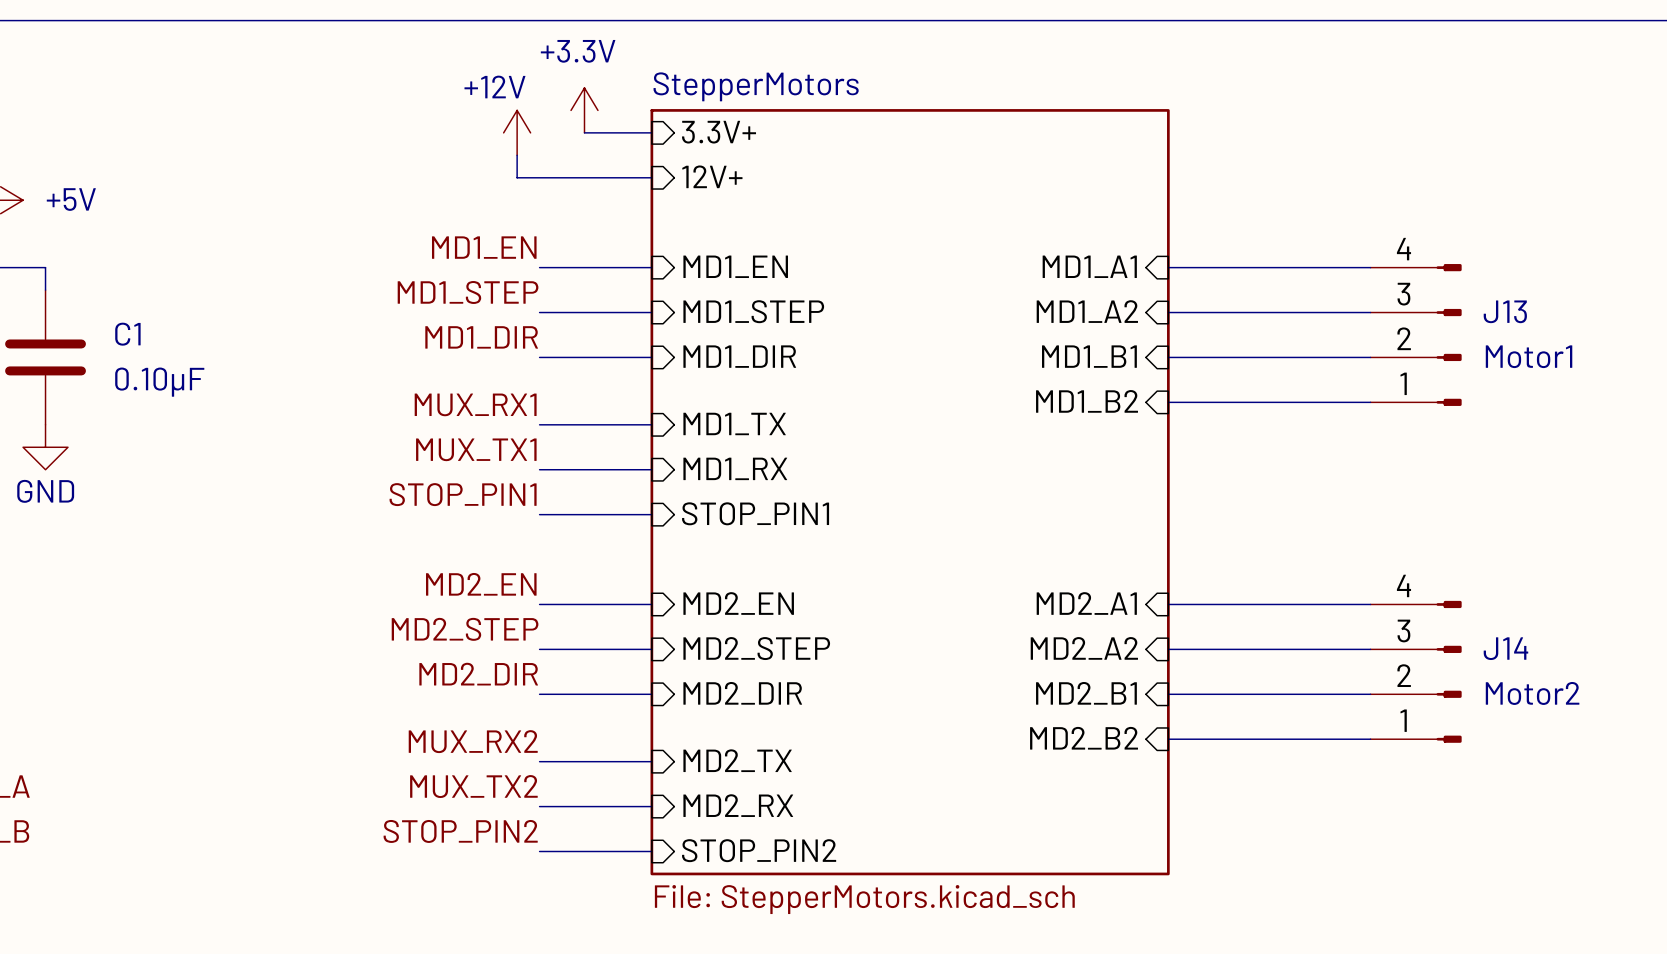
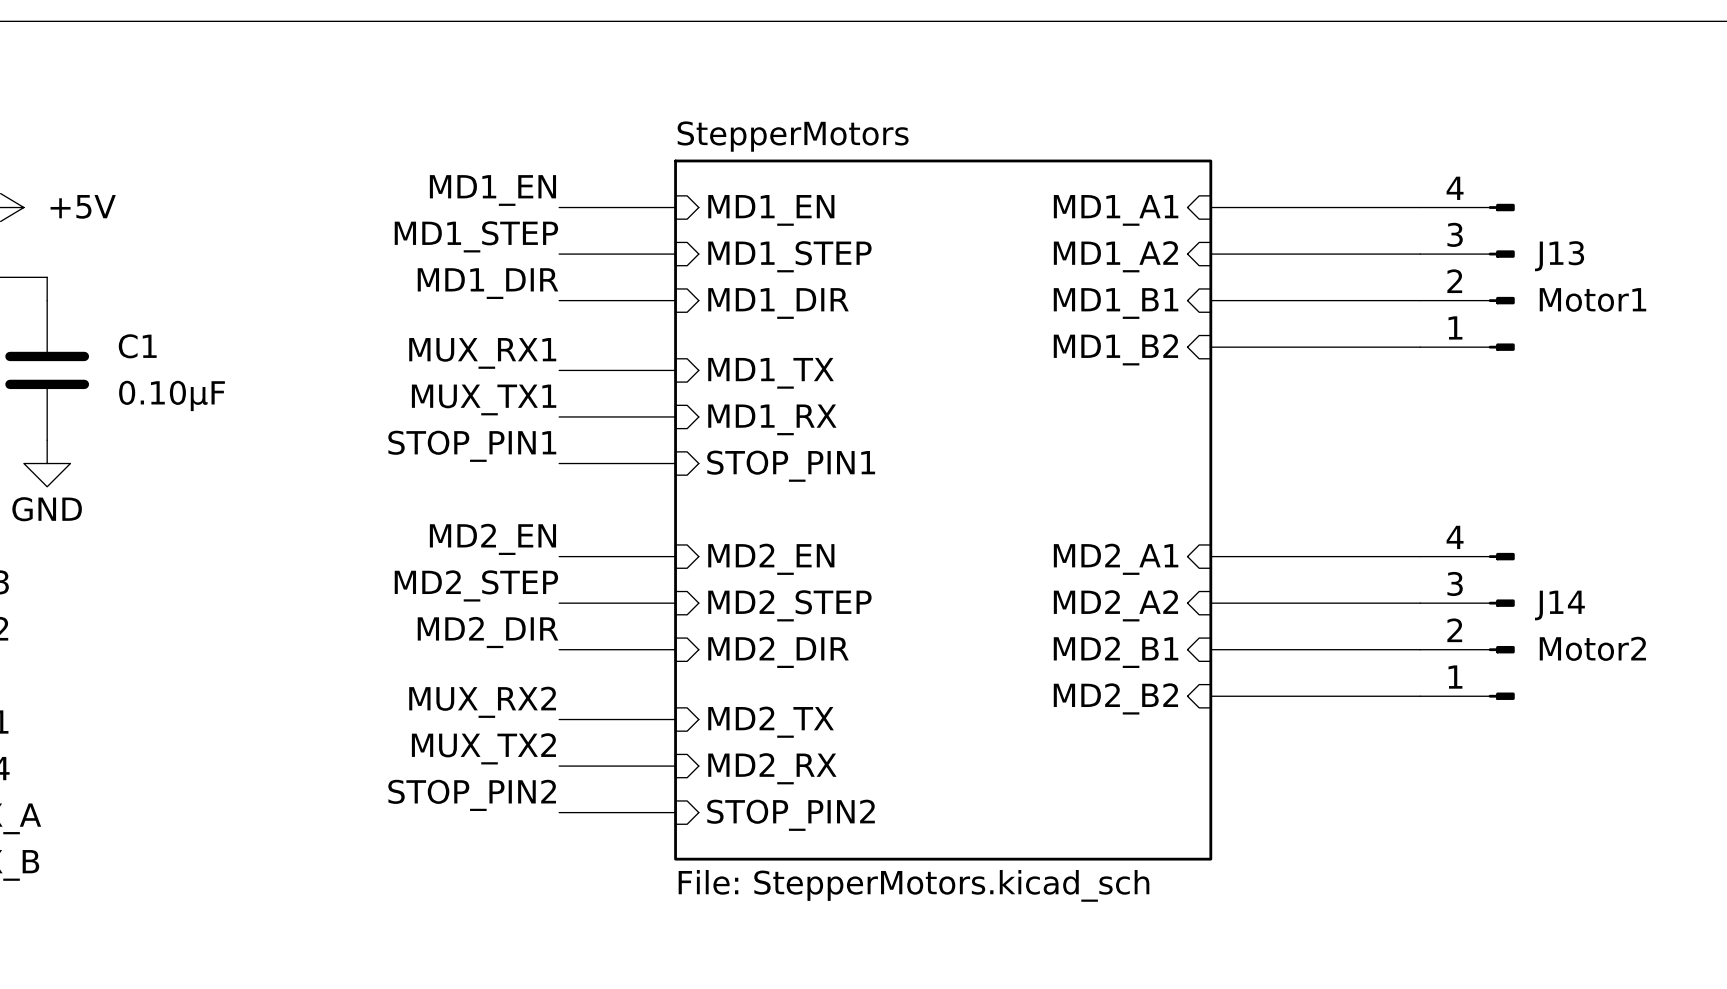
sheet StepperMotors name position: StepperMotors (756, 86) -> StepperMotors (793, 136)
sheet StepperMotors shape: [650, 109, 1170, 876] -> [674, 159, 1213, 861]
power symbol: +3.3V (584, 110) -> none
power symbol: +12V (517, 132) -> none
wire: (584, 132) (651, 132) -> none
sheet pin: 3.3V+ (719, 132) -> none
wire: (517, 155) (517, 177) (651, 177) -> none
sheet pin: 12V+ (712, 176) -> none
label position: MD1_EN (484, 247) -> MD1_EN (492, 190)
sheet pin position: MD1_EN (735, 266) -> MD1_EN (771, 210)
sheet pin position: MD1_A1 (1089, 266) -> MD1_A1 (1116, 210)
wire: (539, 267) (651, 267) -> (559, 207) (675, 207)
wire: (1168, 267) (1370, 267) -> (1210, 207) (1420, 207)
label: none -> MD1_DIR (488, 283)
sheet pin: none -> MD1_DIR (778, 303)
label position: MD1_STEP (468, 292) -> MD1_STEP (476, 236)
sheet pin position: MD1_STEP (753, 311) -> MD1_STEP (789, 256)
sheet pin position: MD1_A2 (1087, 311) -> MD1_A2 (1115, 256)
wire: (539, 312) (651, 312) -> (559, 254) (675, 254)
wire: (1168, 312) (1370, 312) -> (1210, 254) (1420, 254)
J13 position: (1416, 334) -> (1467, 277)
label: MD1_DIR (481, 337) -> MUX_RX1 (482, 353)
sheet pin: MD1_DIR (739, 356) -> MD1_TX (771, 373)
sheet pin position: MD1_B1 (1089, 356) -> MD1_B1 (1116, 303)
wire: (1168, 357) (1370, 357) -> (1210, 300) (1420, 300)
sheet pin position: MD1_B2 (1087, 401) -> MD1_B2 (1115, 349)
wire: (1168, 402) (1370, 402) -> (1210, 347) (1420, 347)
label: MUX_RX1 (475, 404) -> none
sheet pin: MD1_TX (734, 423) -> none
wire: (539, 424) (651, 424) -> (559, 300) (675, 300)
label position: MUX_TX1 (476, 449) -> MUX_TX1 (484, 399)
sheet pin position: MD1_RX (735, 468) -> MD1_RX (772, 419)
wire: (539, 469) (651, 469) -> (559, 416) (675, 416)
label position: STOP_PIN1 (463, 494) -> STOP_PIN1 (472, 446)
sheet pin position: STOP_PIN1 (755, 513) -> STOP_PIN1 (791, 466)
wire: (539, 514) (651, 514) -> (559, 463) (675, 463)
label position: MD2_EN (481, 584) -> MD2_EN (492, 539)
sheet pin position: MD2_EN (738, 603) -> MD2_EN (771, 559)
sheet pin position: MD2_A1 (1086, 603) -> MD2_A1 (1116, 559)
wire: (539, 604) (651, 604) -> (559, 556) (675, 556)
wire: (1168, 604) (1370, 604) -> (1210, 556) (1420, 556)
label: none -> MD2_DIR (488, 632)
sheet pin: none -> MD2_DIR (778, 652)
label position: MD2_STEP (465, 629) -> MD2_STEP (476, 585)
sheet pin position: MD2_STEP (756, 648) -> MD2_STEP (789, 605)
sheet pin position: MD2_A2 (1084, 648) -> MD2_A2 (1115, 605)
wire: (539, 649) (651, 649) -> (559, 603) (675, 603)
wire: (1168, 649) (1370, 649) -> (1210, 603) (1420, 603)
J14 position: (1416, 671) -> (1467, 626)
label: MD2_DIR (478, 674) -> MUX_RX2 (482, 702)
sheet pin: MD2_DIR (742, 693) -> MD2_TX (771, 722)
sheet pin position: MD2_B1 (1086, 693) -> MD2_B1 (1116, 652)
wire: (1168, 694) (1370, 694) -> (1210, 649) (1420, 649)
sheet pin position: MD2_B2 (1084, 738) -> MD2_B2 (1115, 698)
wire: (1168, 739) (1370, 739) -> (1210, 696) (1420, 696)
label: MUX_RX2 (473, 741) -> none
sheet pin: MD2_TX (737, 760) -> none
wire: (539, 761) (651, 761) -> (559, 649) (675, 649)
label position: MUX_TX2 (473, 786) -> MUX_TX2 (483, 748)
sheet pin position: MD2_RX (738, 805) -> MD2_RX (772, 768)
wire: (539, 806) (651, 806) -> (559, 766) (675, 766)
label position: STOP_PIN2 (460, 831) -> STOP_PIN2 (472, 795)
sheet pin position: STOP_PIN2 (759, 850) -> STOP_PIN2 (791, 815)
wire: (539, 851) (651, 851) -> (559, 812) (675, 812)
sheet StepperMotors value position: File: StepperMotors.kicad_sch (864, 899) -> File: StepperMotors.kicad_sch (913, 885)

